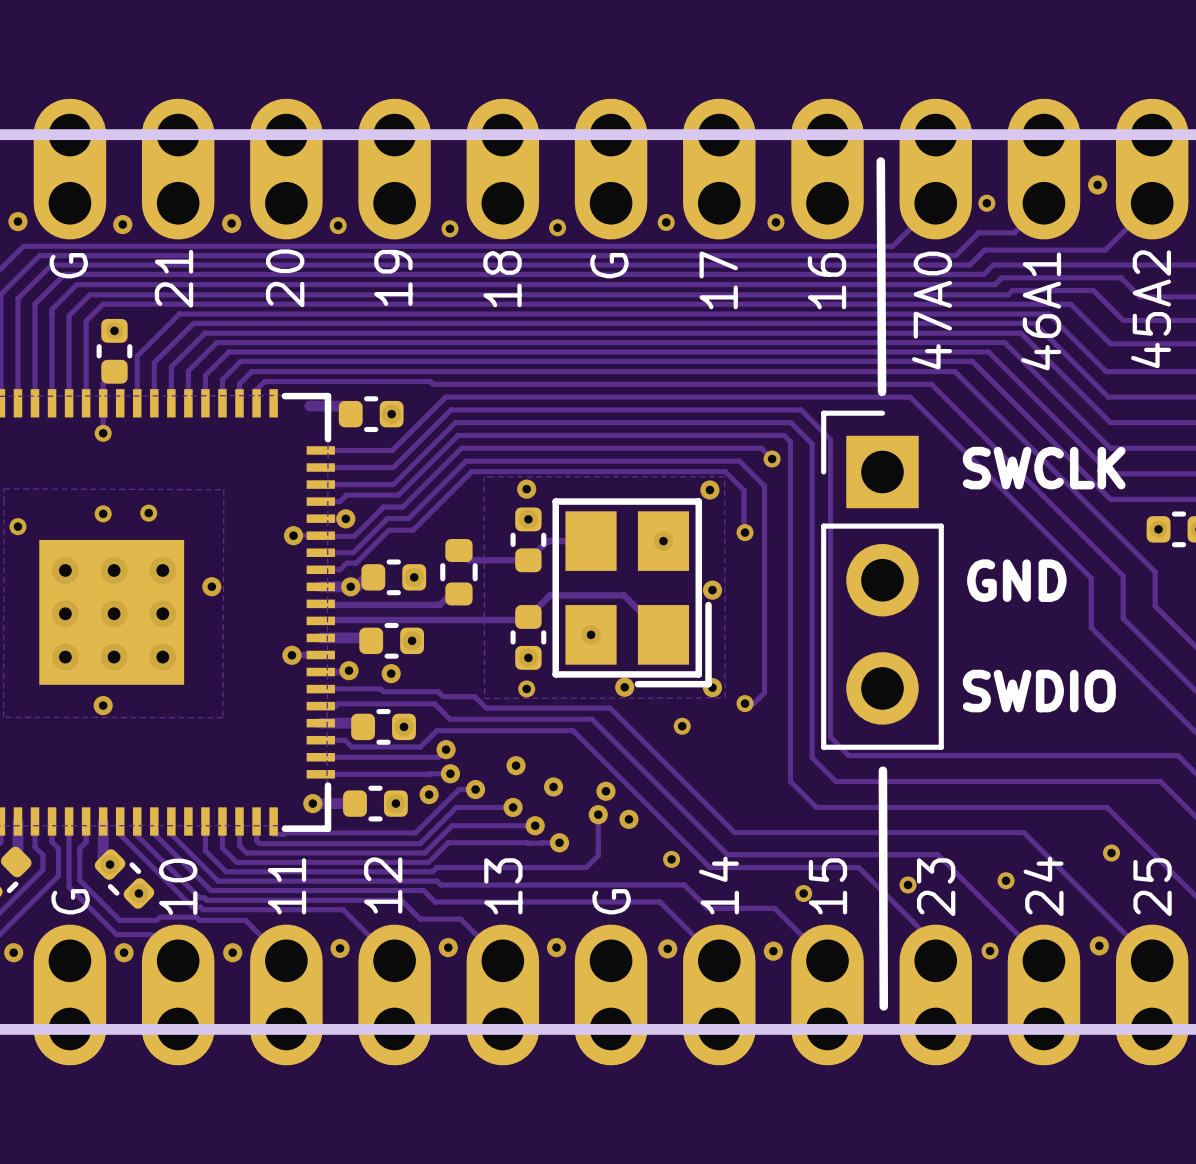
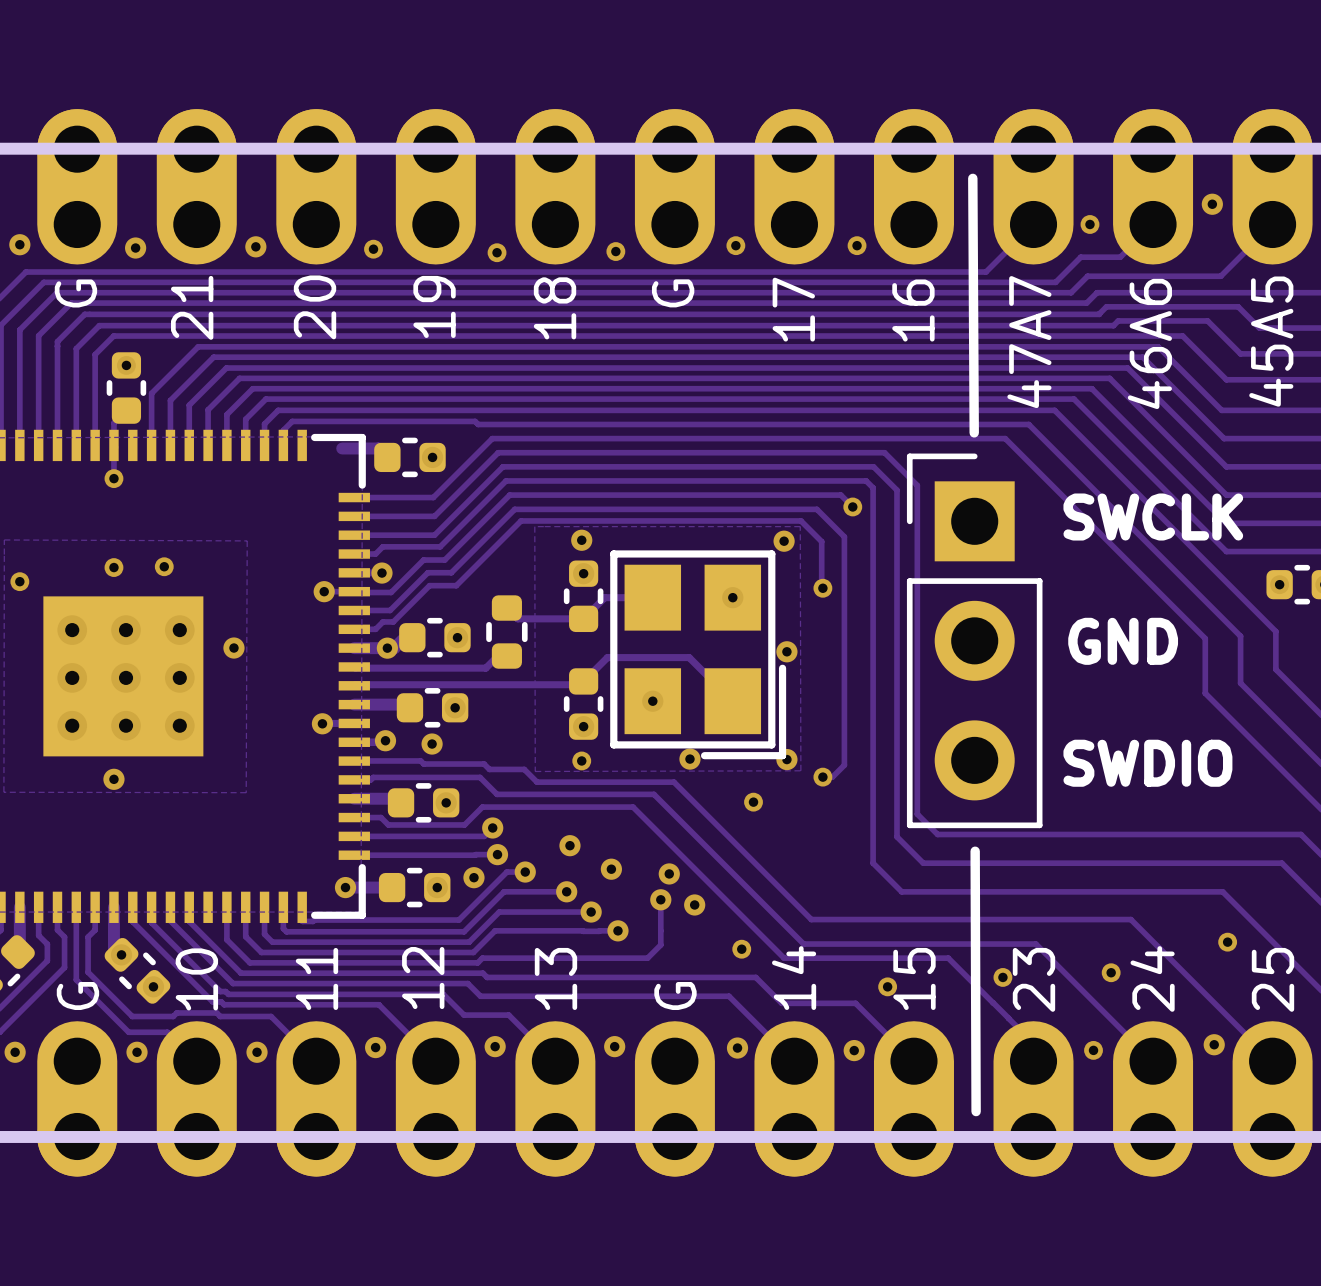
text: 45A2 (1151, 309) -> 45A5 (1271, 341)
text: 47A0 (932, 310) -> 47A7 (1029, 342)
text: 46A1 (1041, 311) -> 46A6 (1149, 343)

